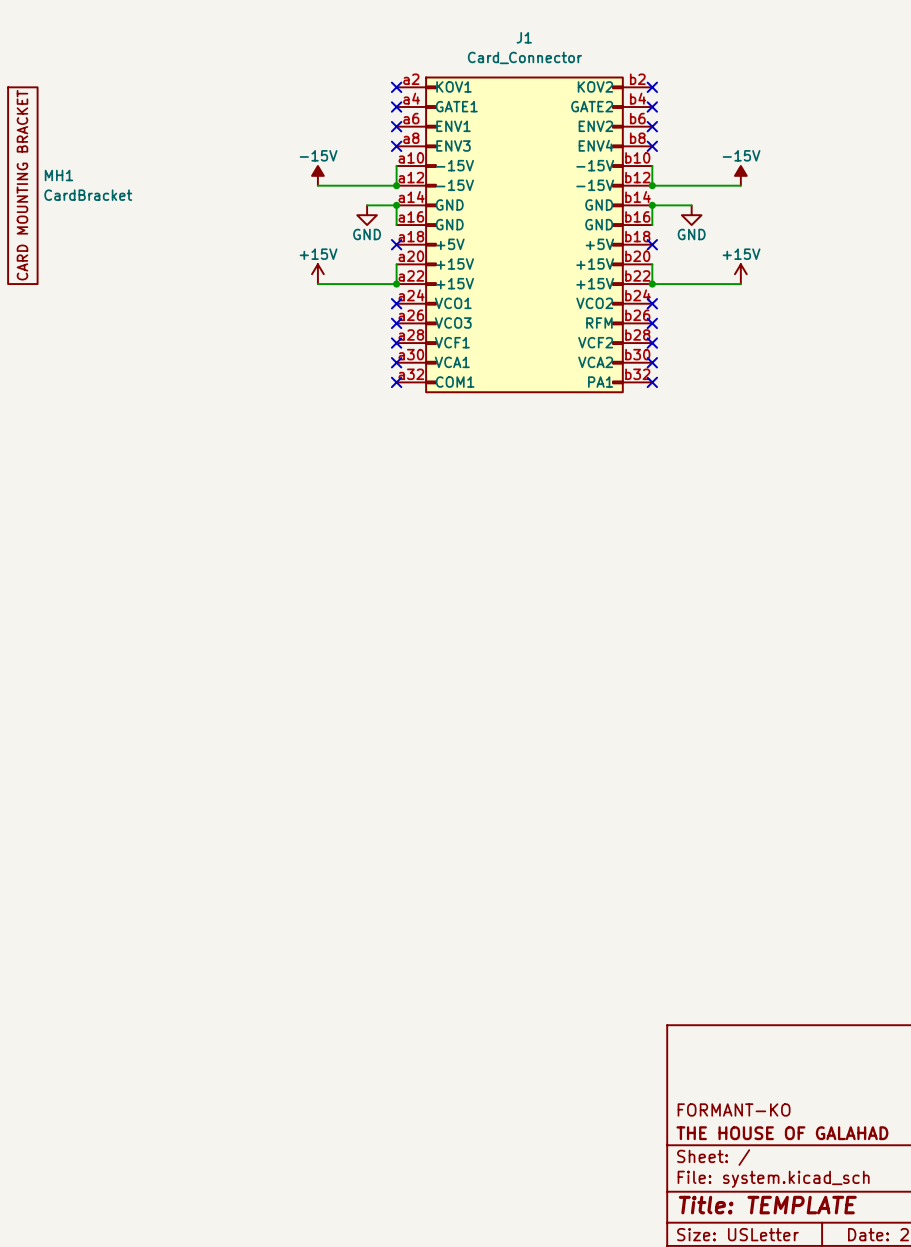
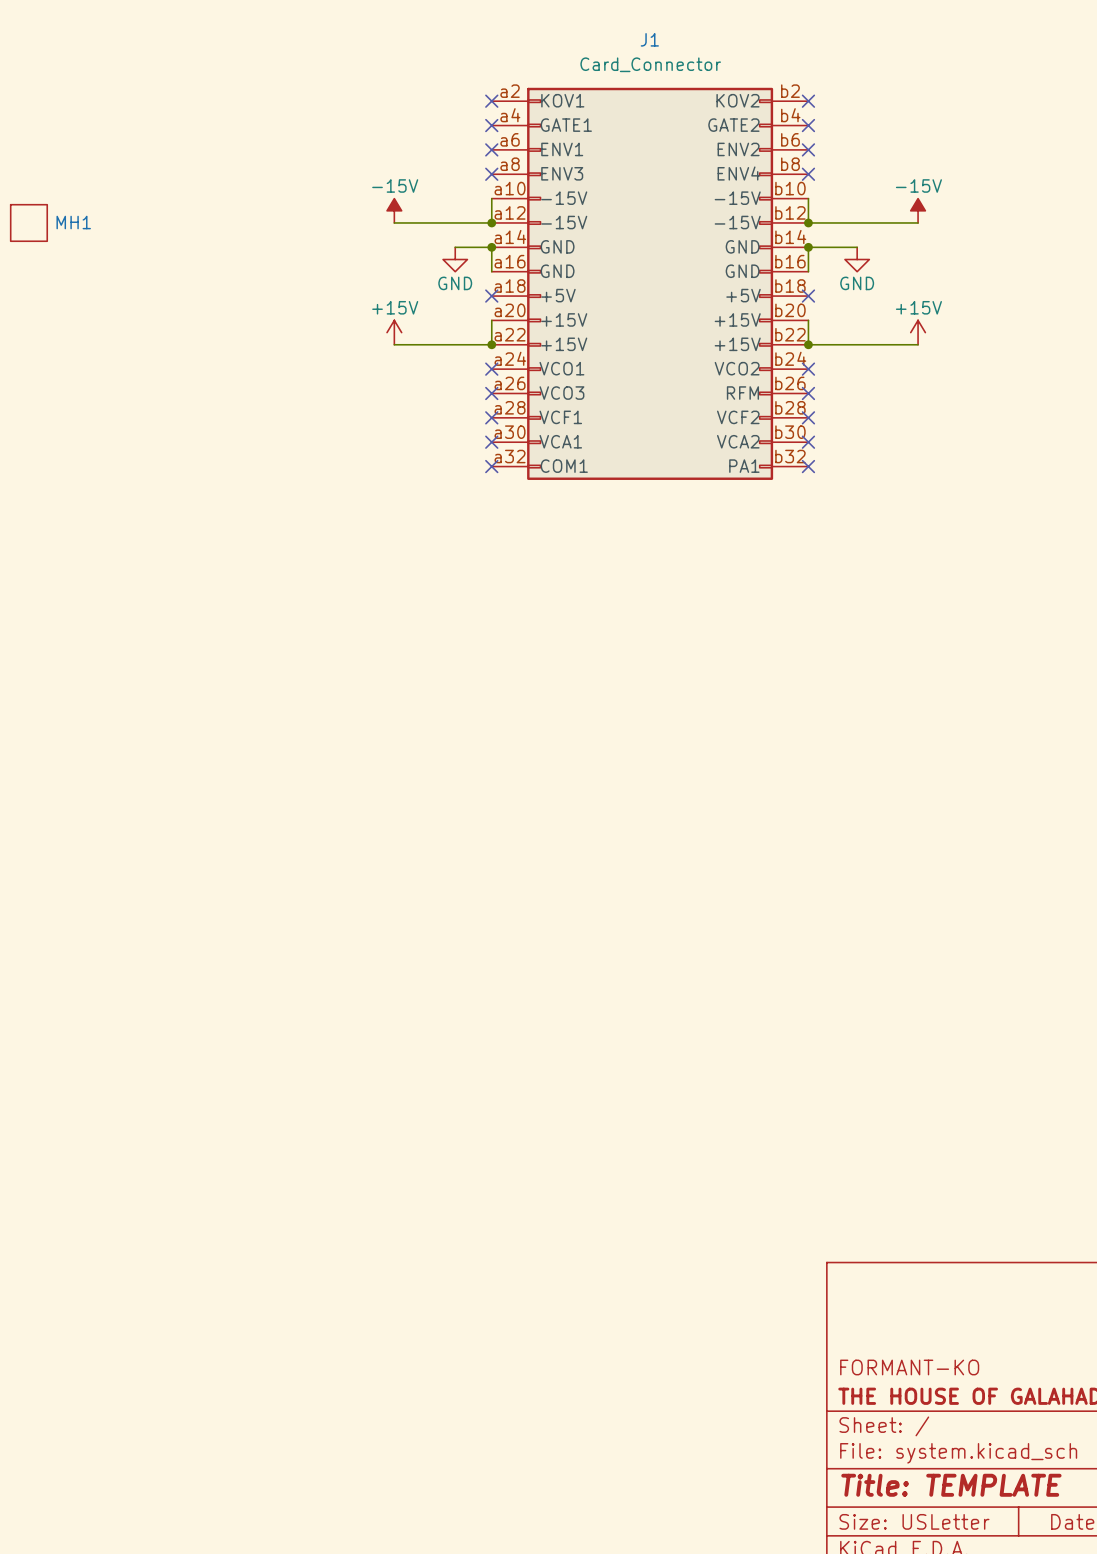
MH1 symbol: [8, 87, 38, 285] -> [10, 204, 48, 242]
MH1 value: CardBracket (88, 195) -> none

